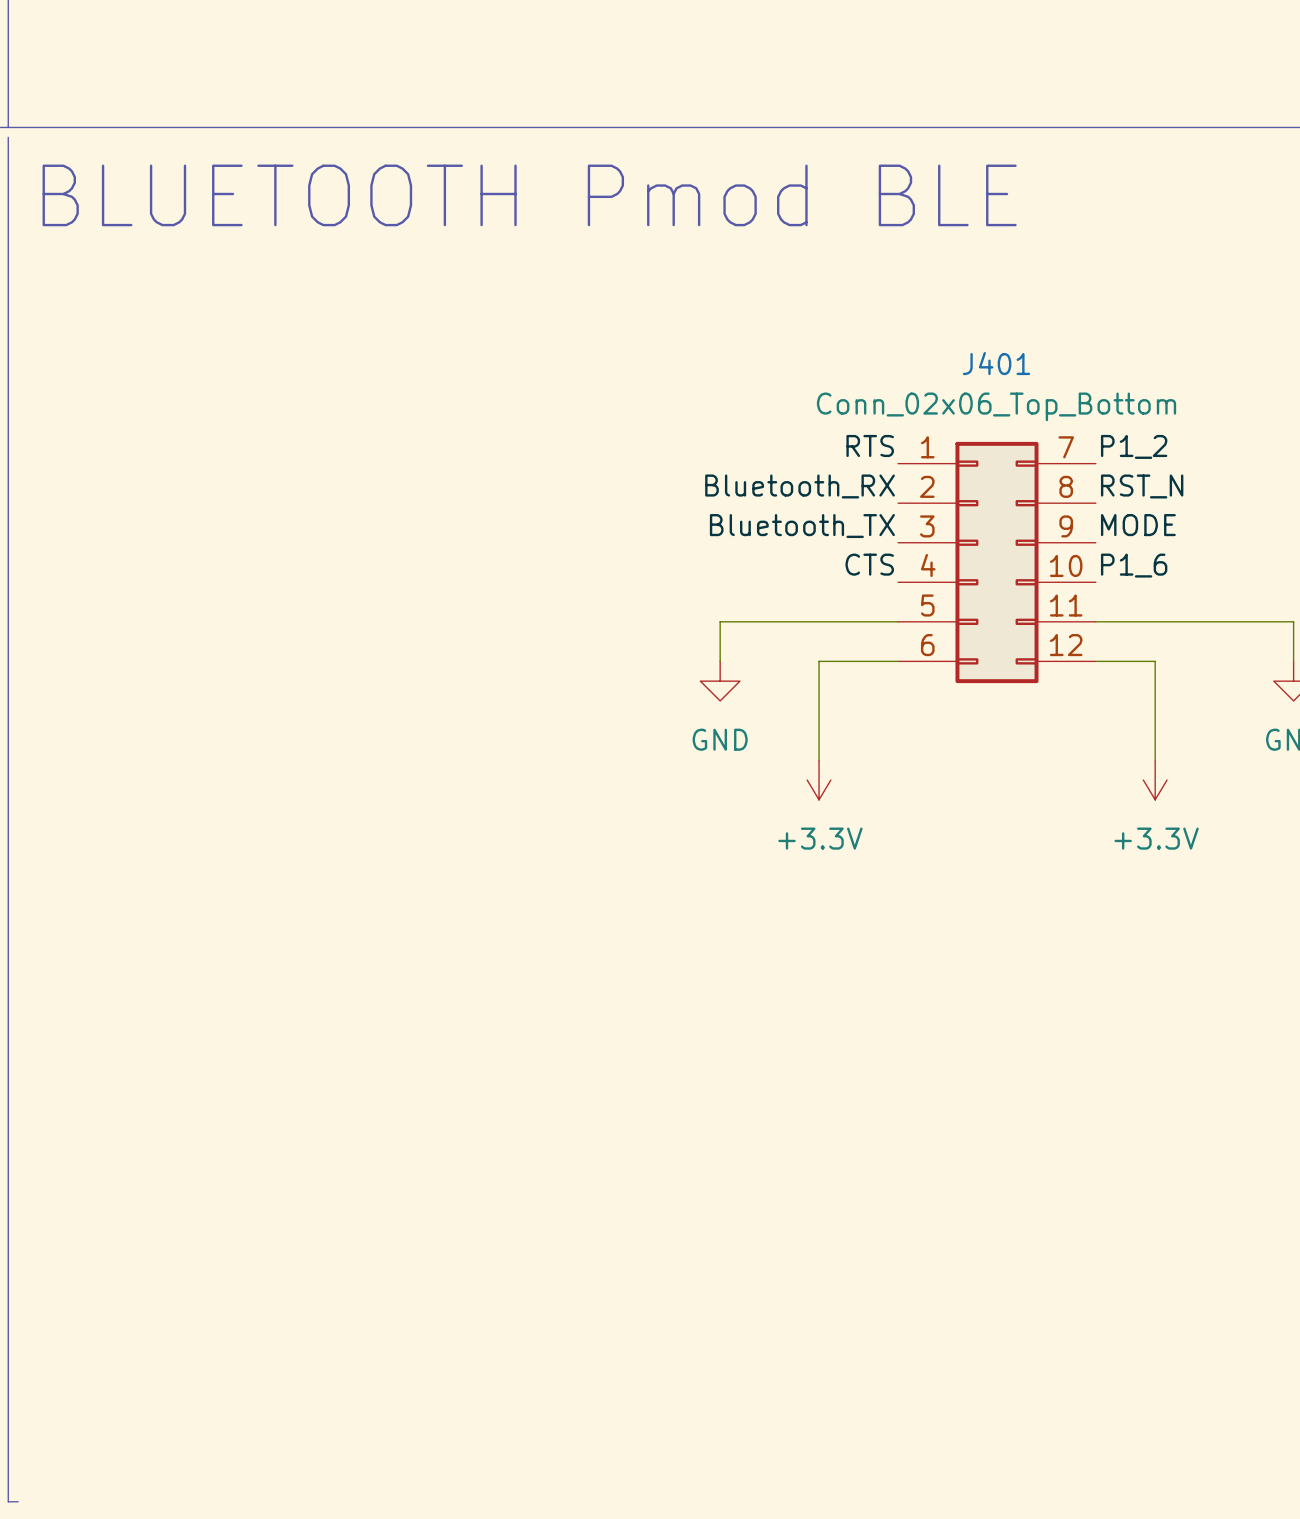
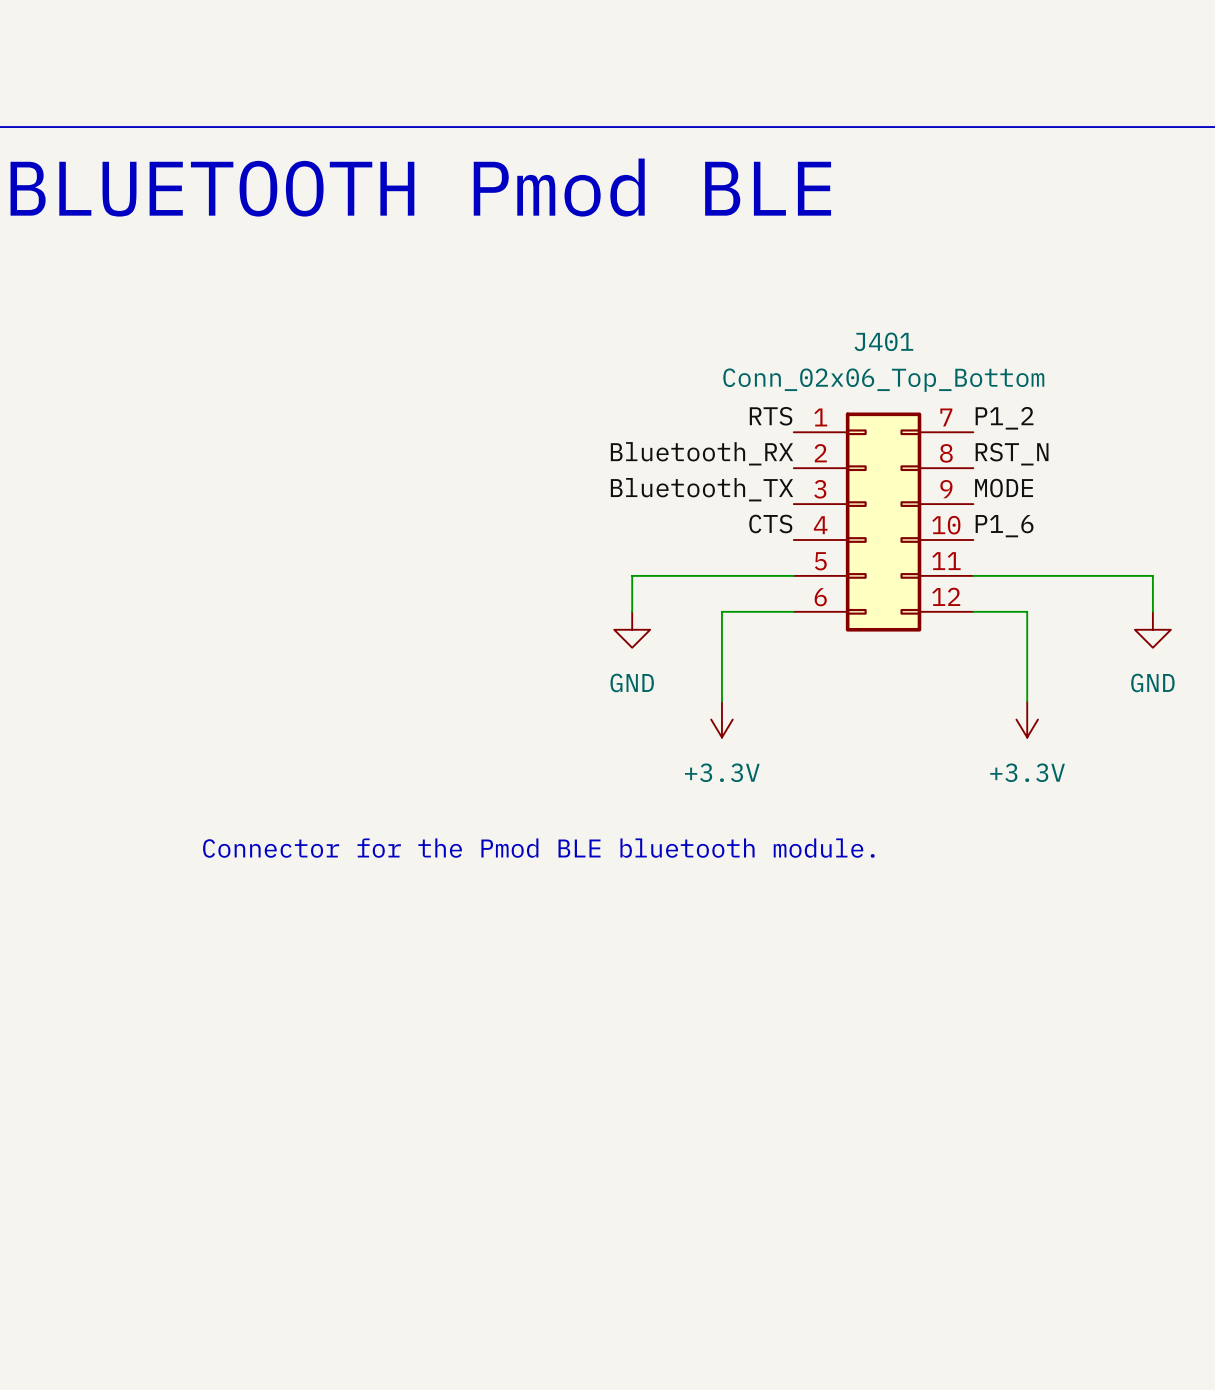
text: none -> Connector for the Pmod BLE bluetooth module. (538, 848)

